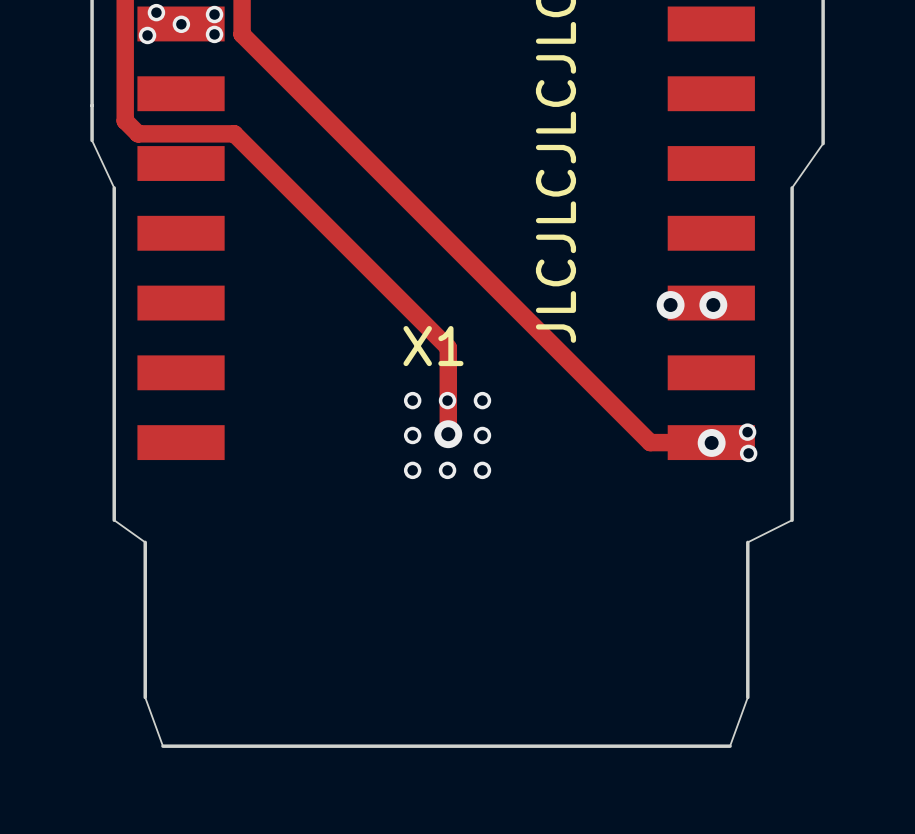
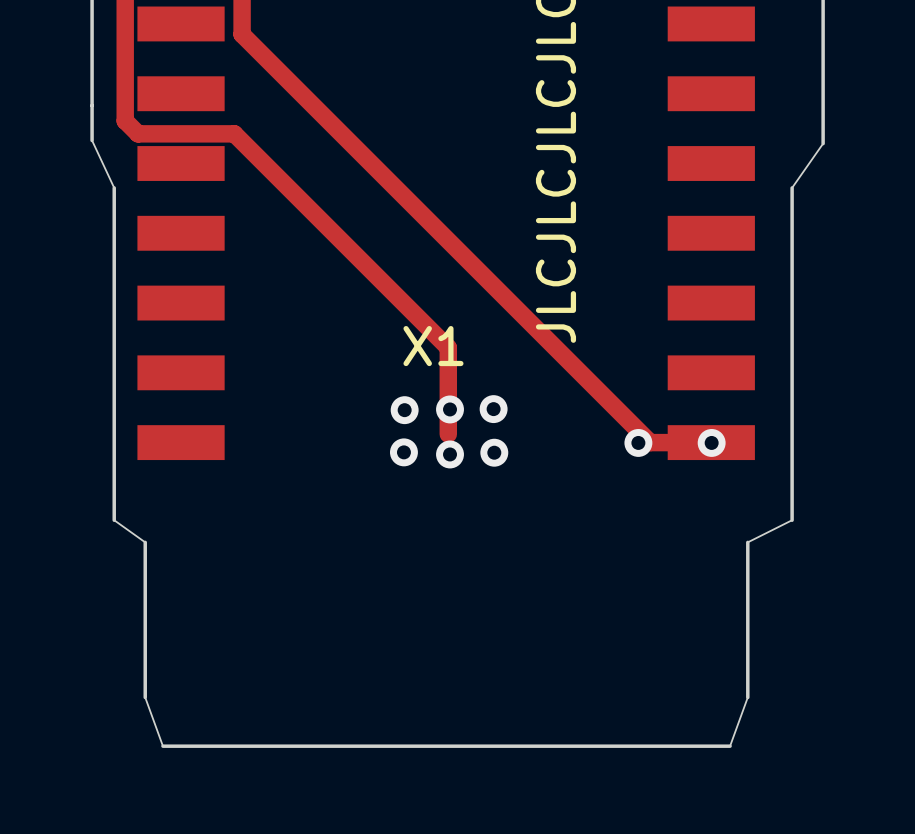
via: (156, 12) -> none
via: (214, 14) -> none
via: (181, 24) -> none
via: (214, 34) -> none
via: (147, 35) -> none
via: (670, 305) -> none
via: (713, 305) -> none
via size: [403, 391, 422, 410] -> [390, 396, 419, 425]
via size: [438, 391, 457, 410] -> [436, 395, 464, 424]
via size: [473, 391, 492, 410] -> [479, 395, 508, 424]
via: (747, 432) -> none
via: (448, 434) -> none
via: (412, 435) -> none
via: (482, 435) -> none
via: none -> (638, 442)
via: none -> (403, 452)
via: none -> (494, 452)
via: (748, 453) -> none
via: none -> (450, 454)
via: (412, 470) -> none
via: (447, 470) -> none
via: (482, 470) -> none

